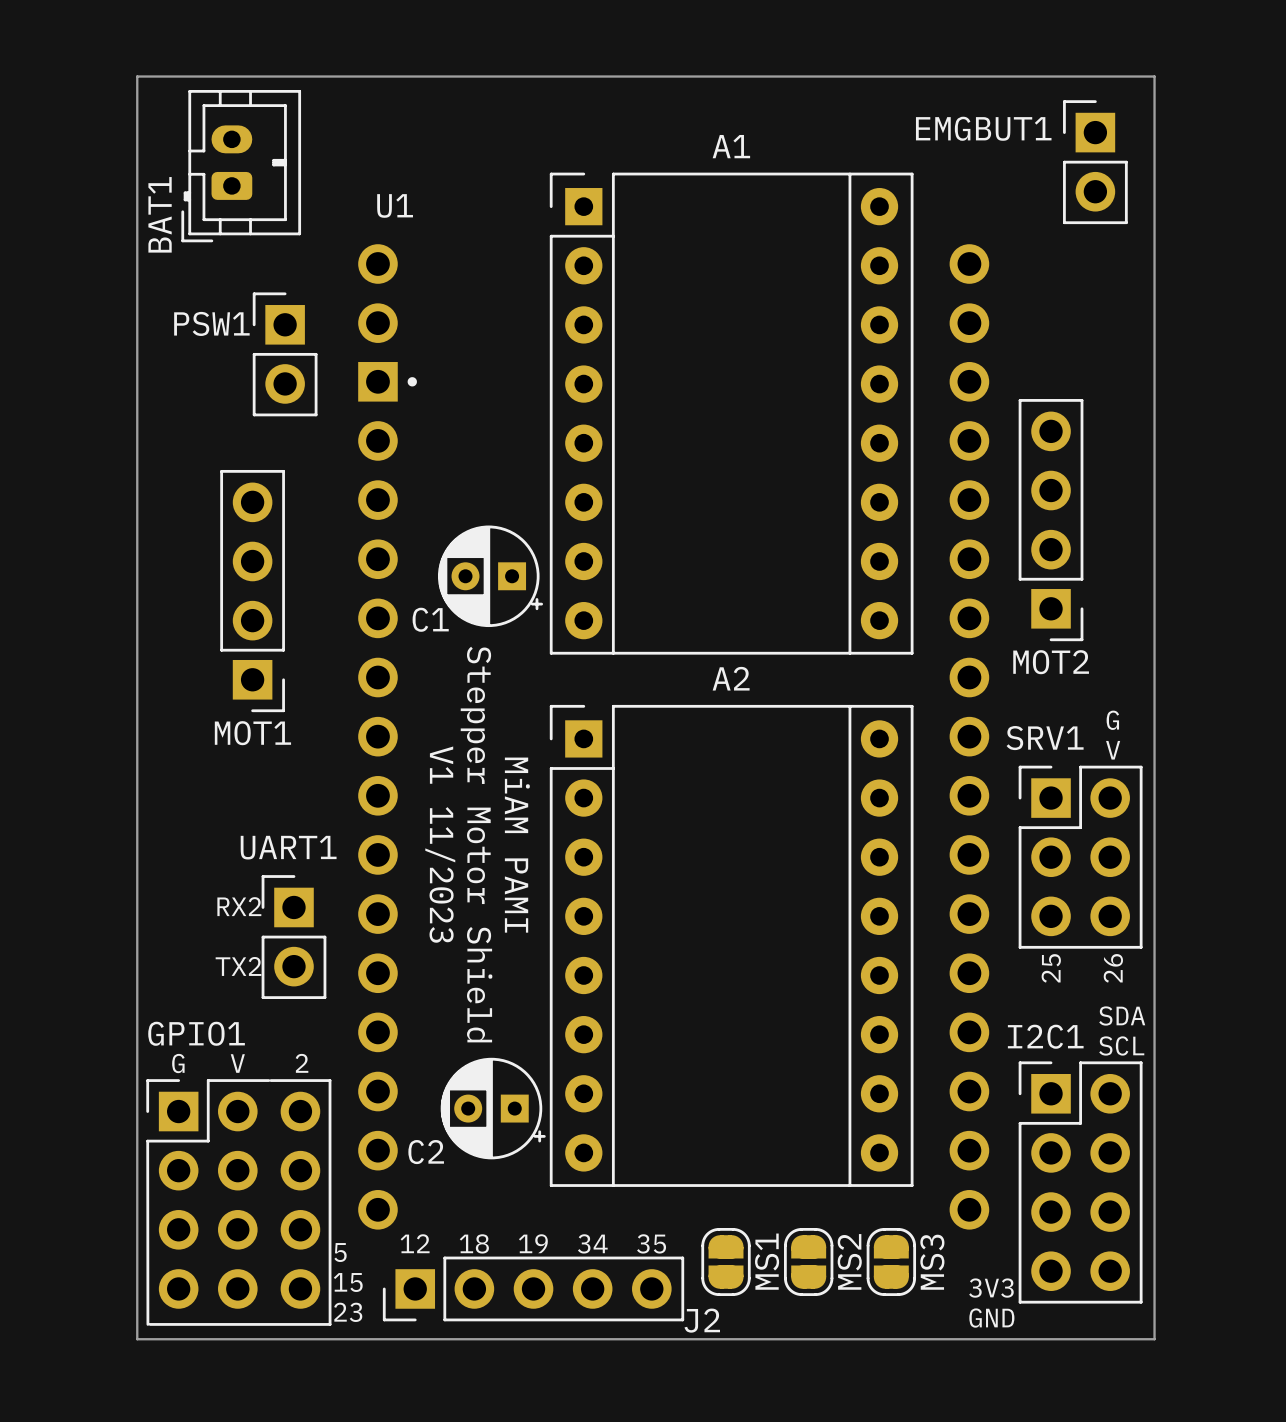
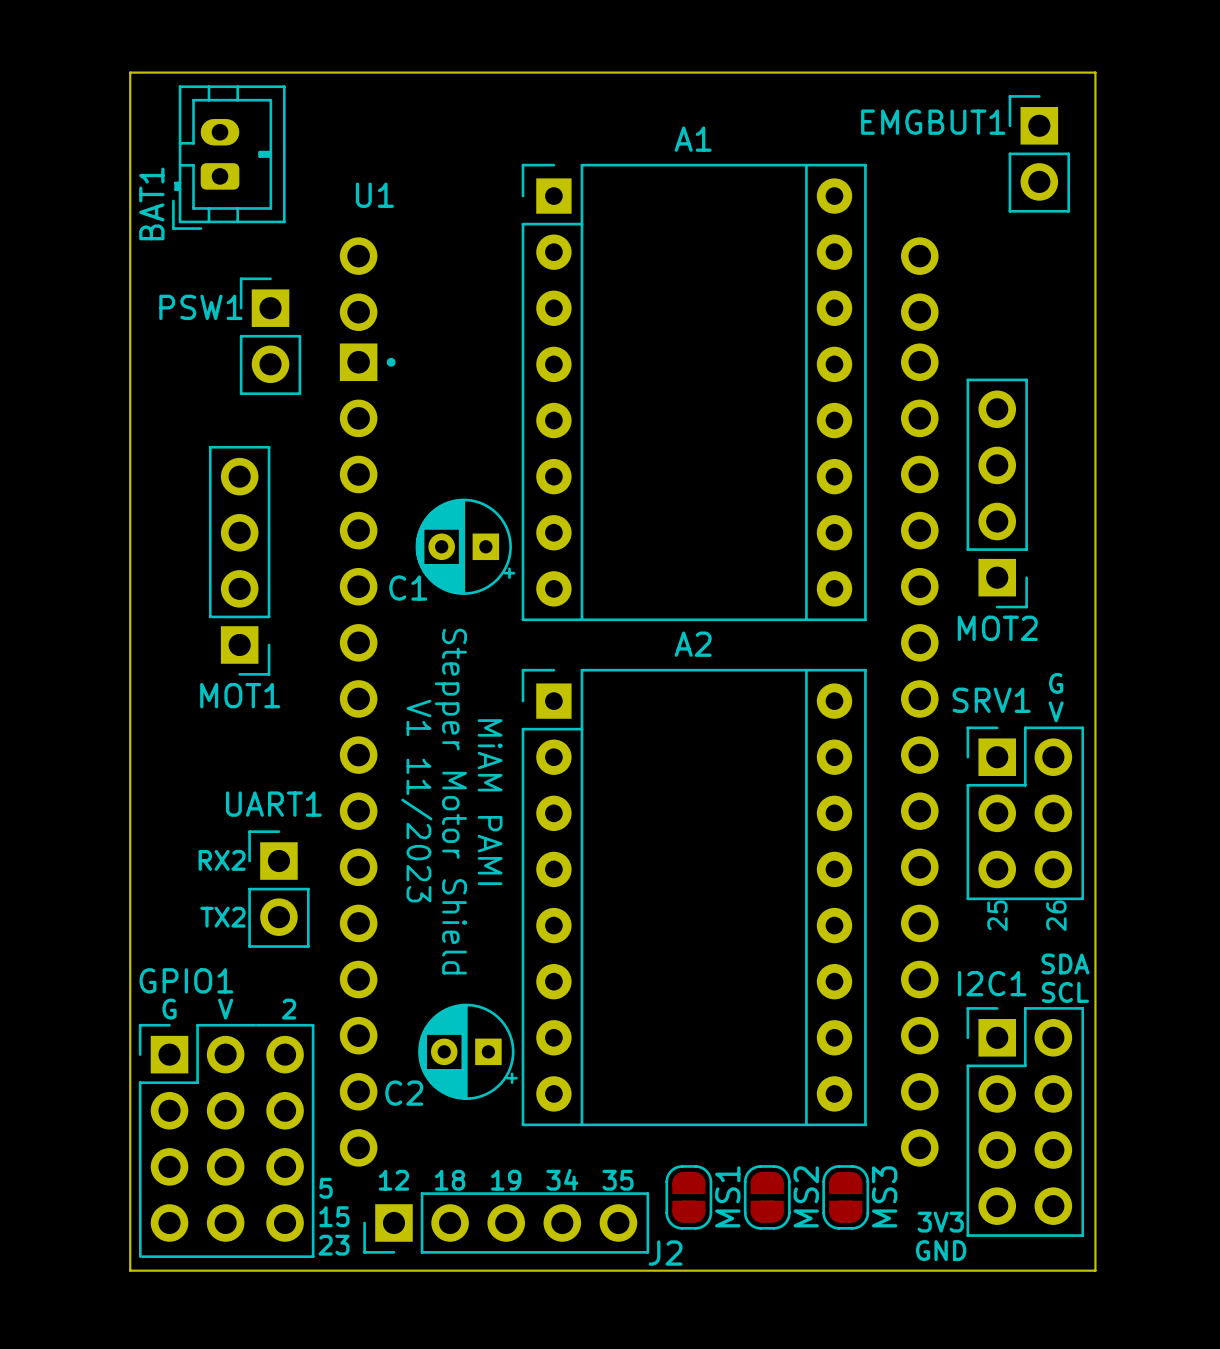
U1 footprint: [358, 244, 990, 1230] -> [339, 237, 939, 1167]

